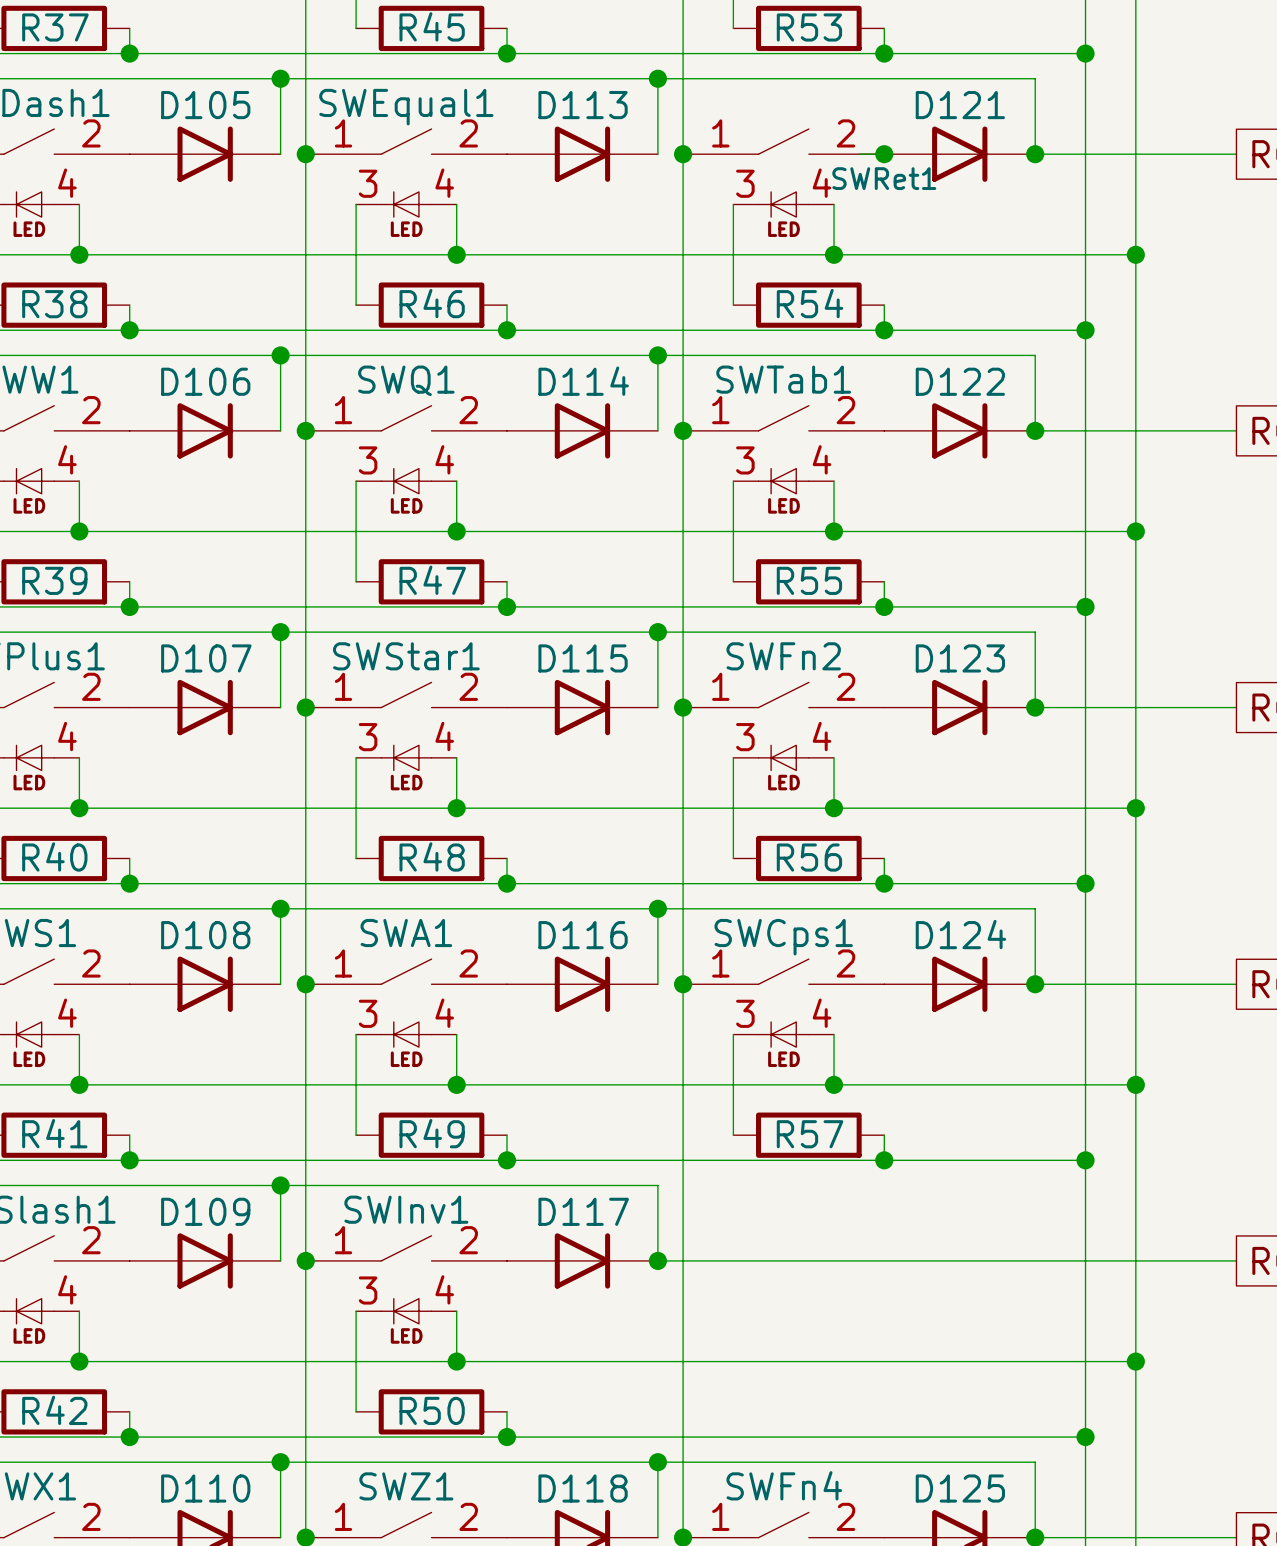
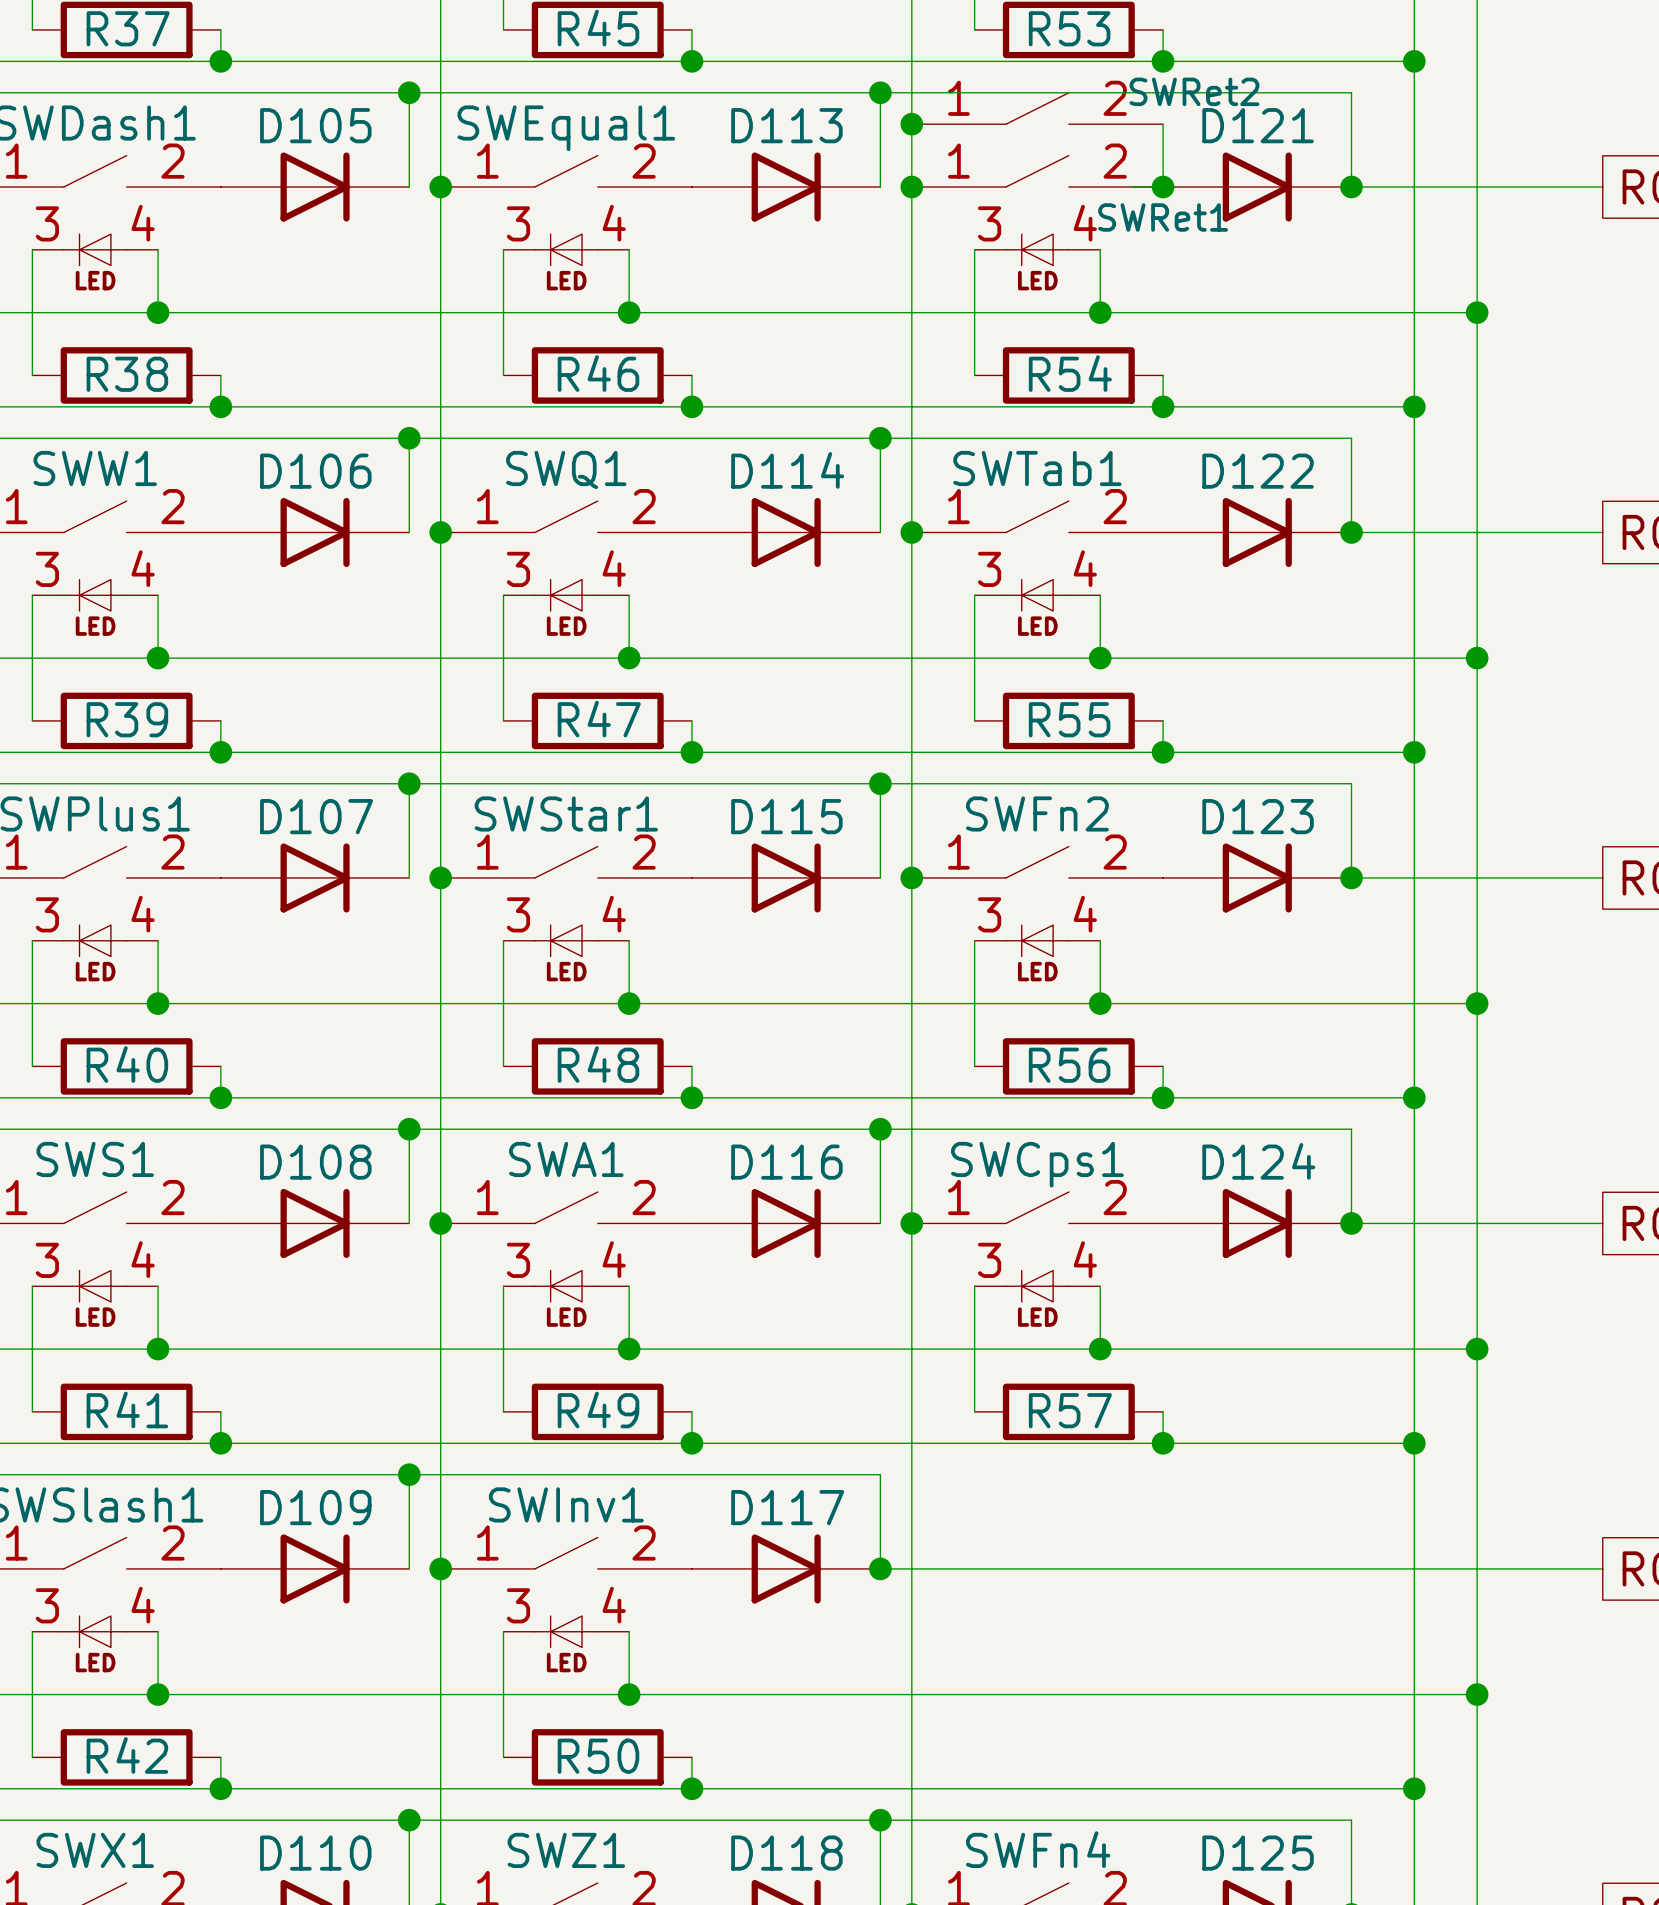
SWRet2: none -> (1037, 108)
junction: none -> (911, 124)
wire: none -> (1163, 124) (1163, 187)

